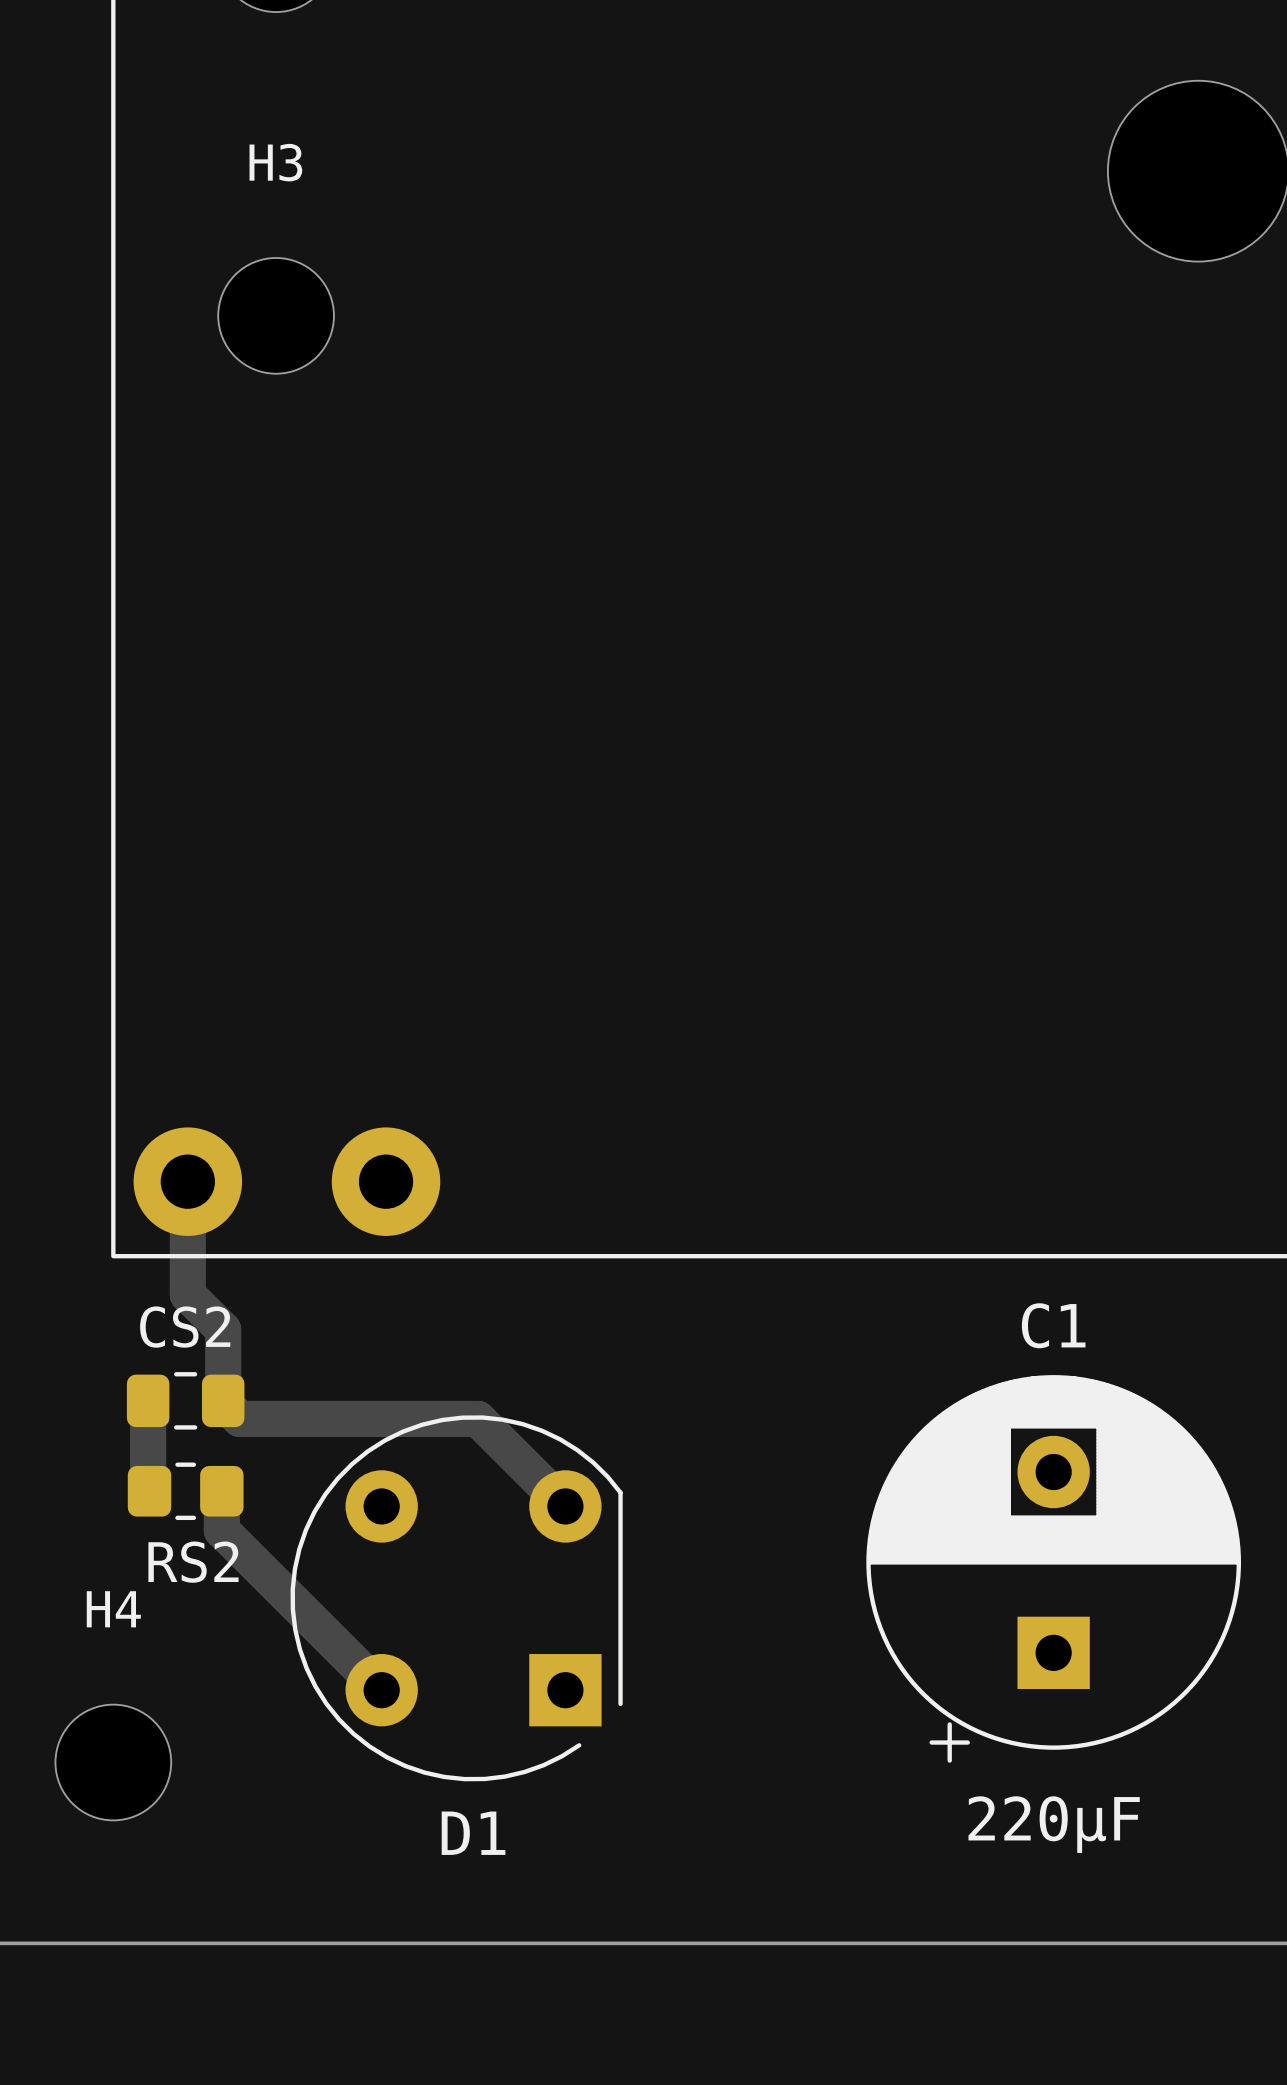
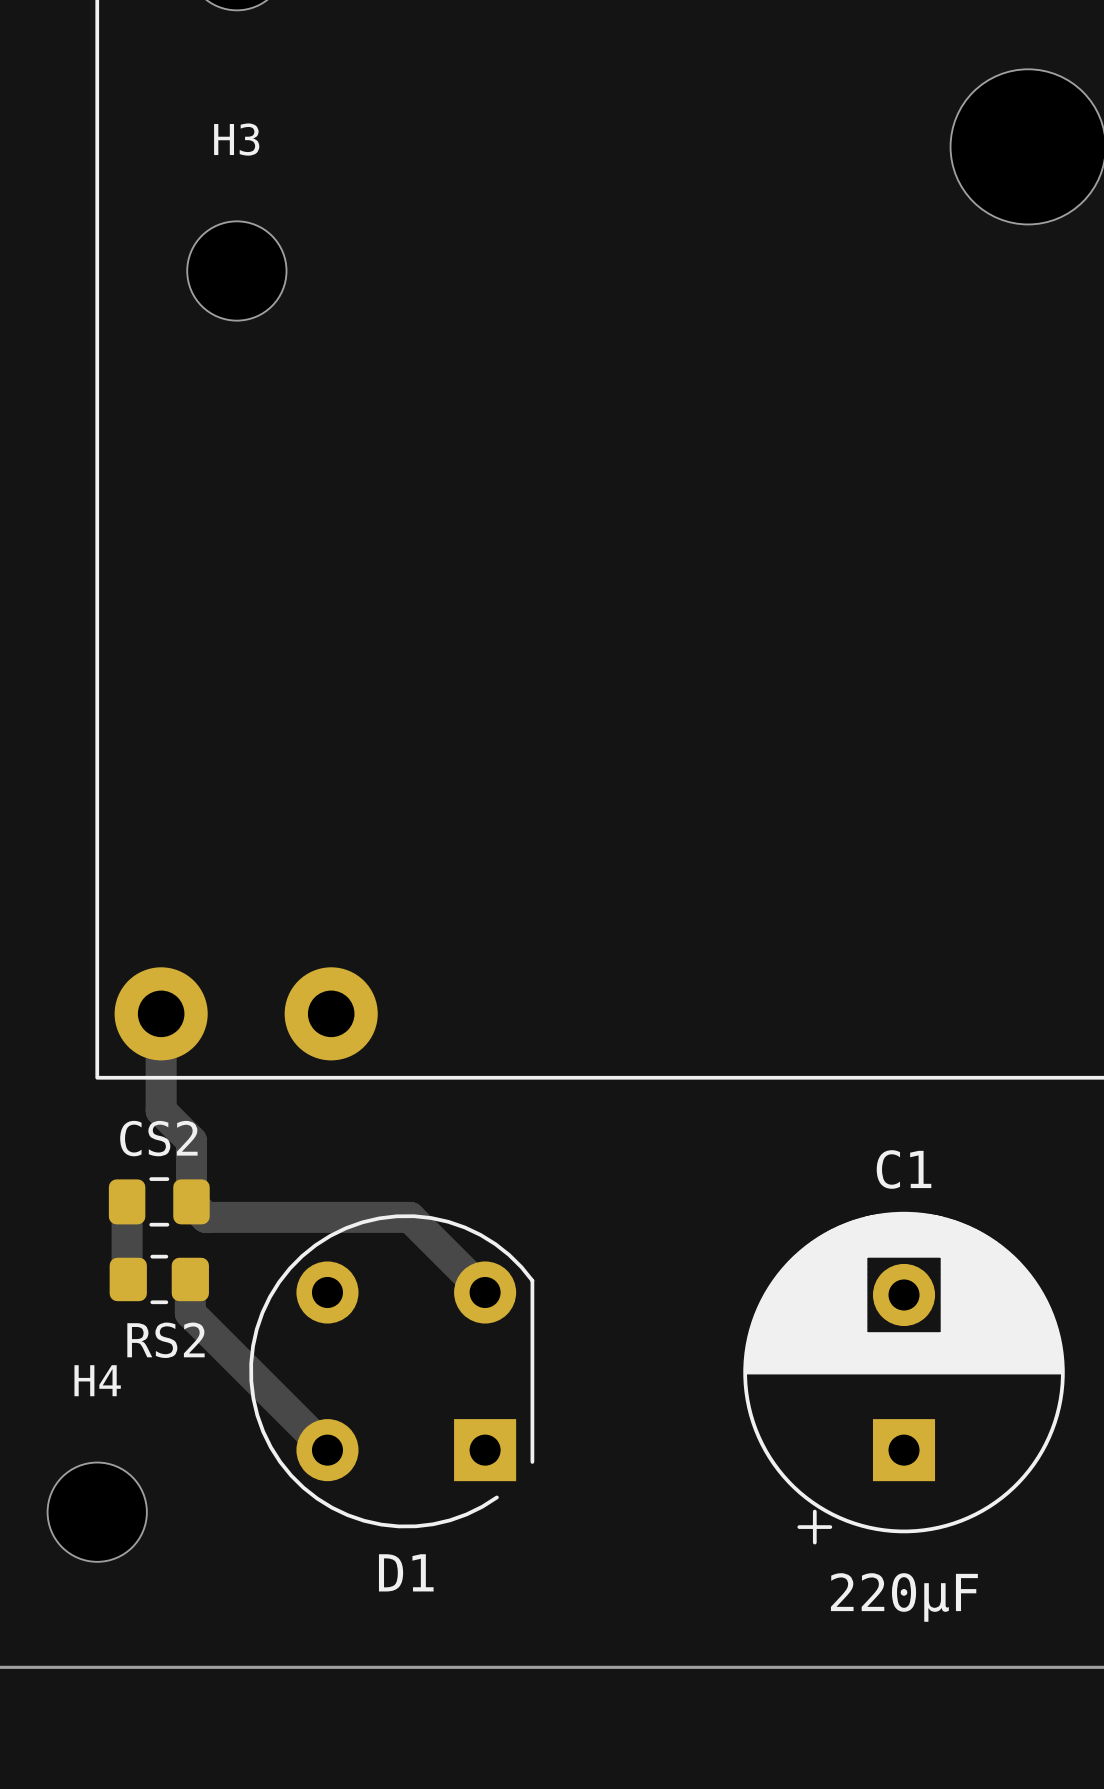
C1 position: (1053, 1568) -> (904, 1378)

